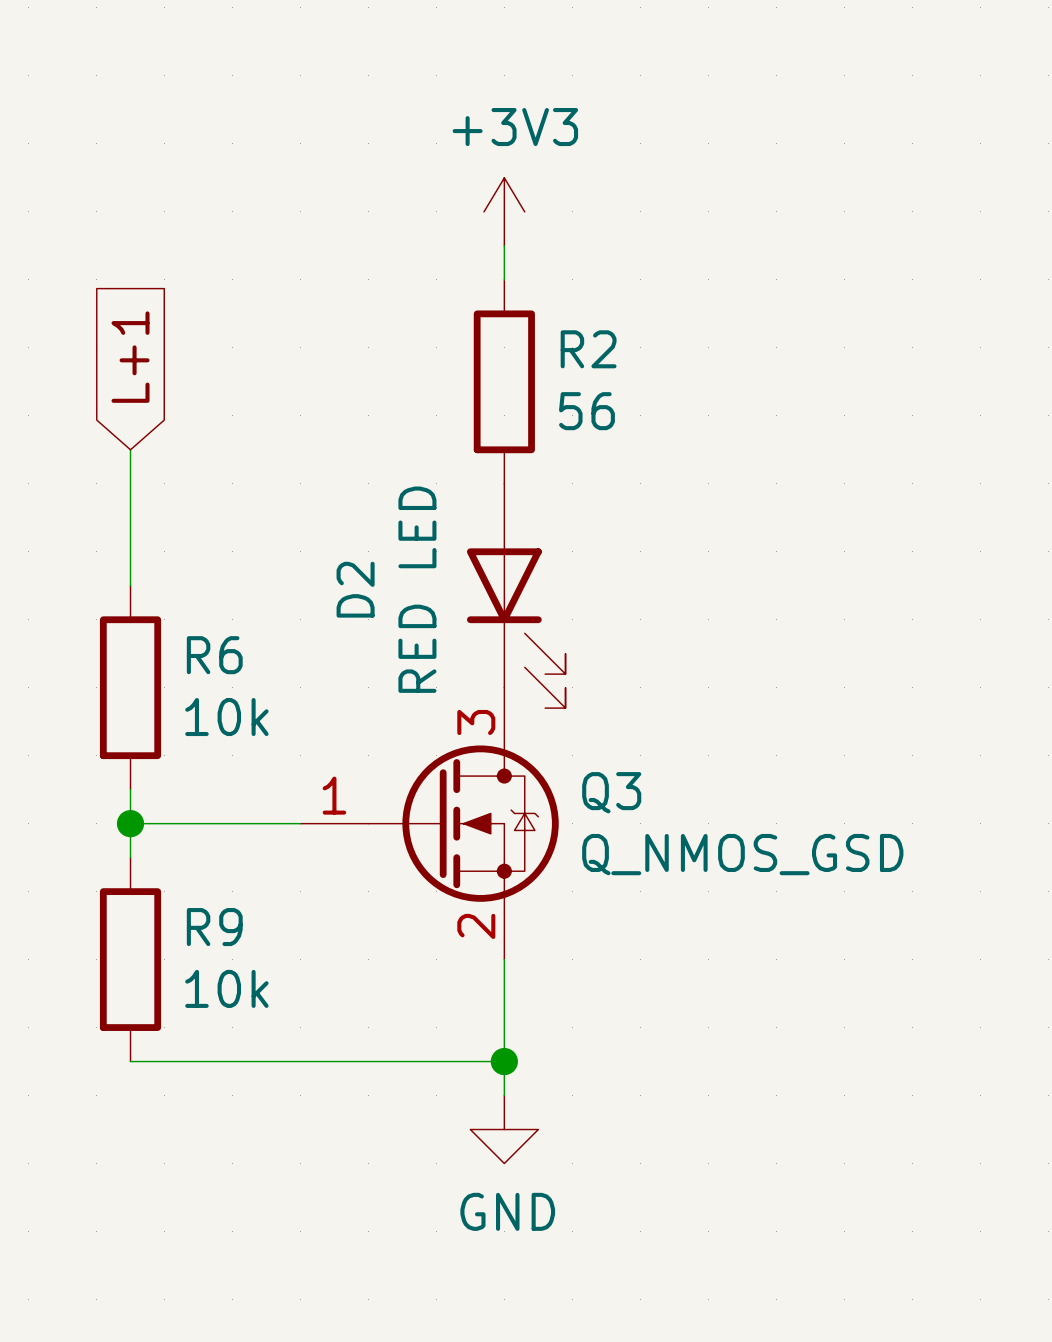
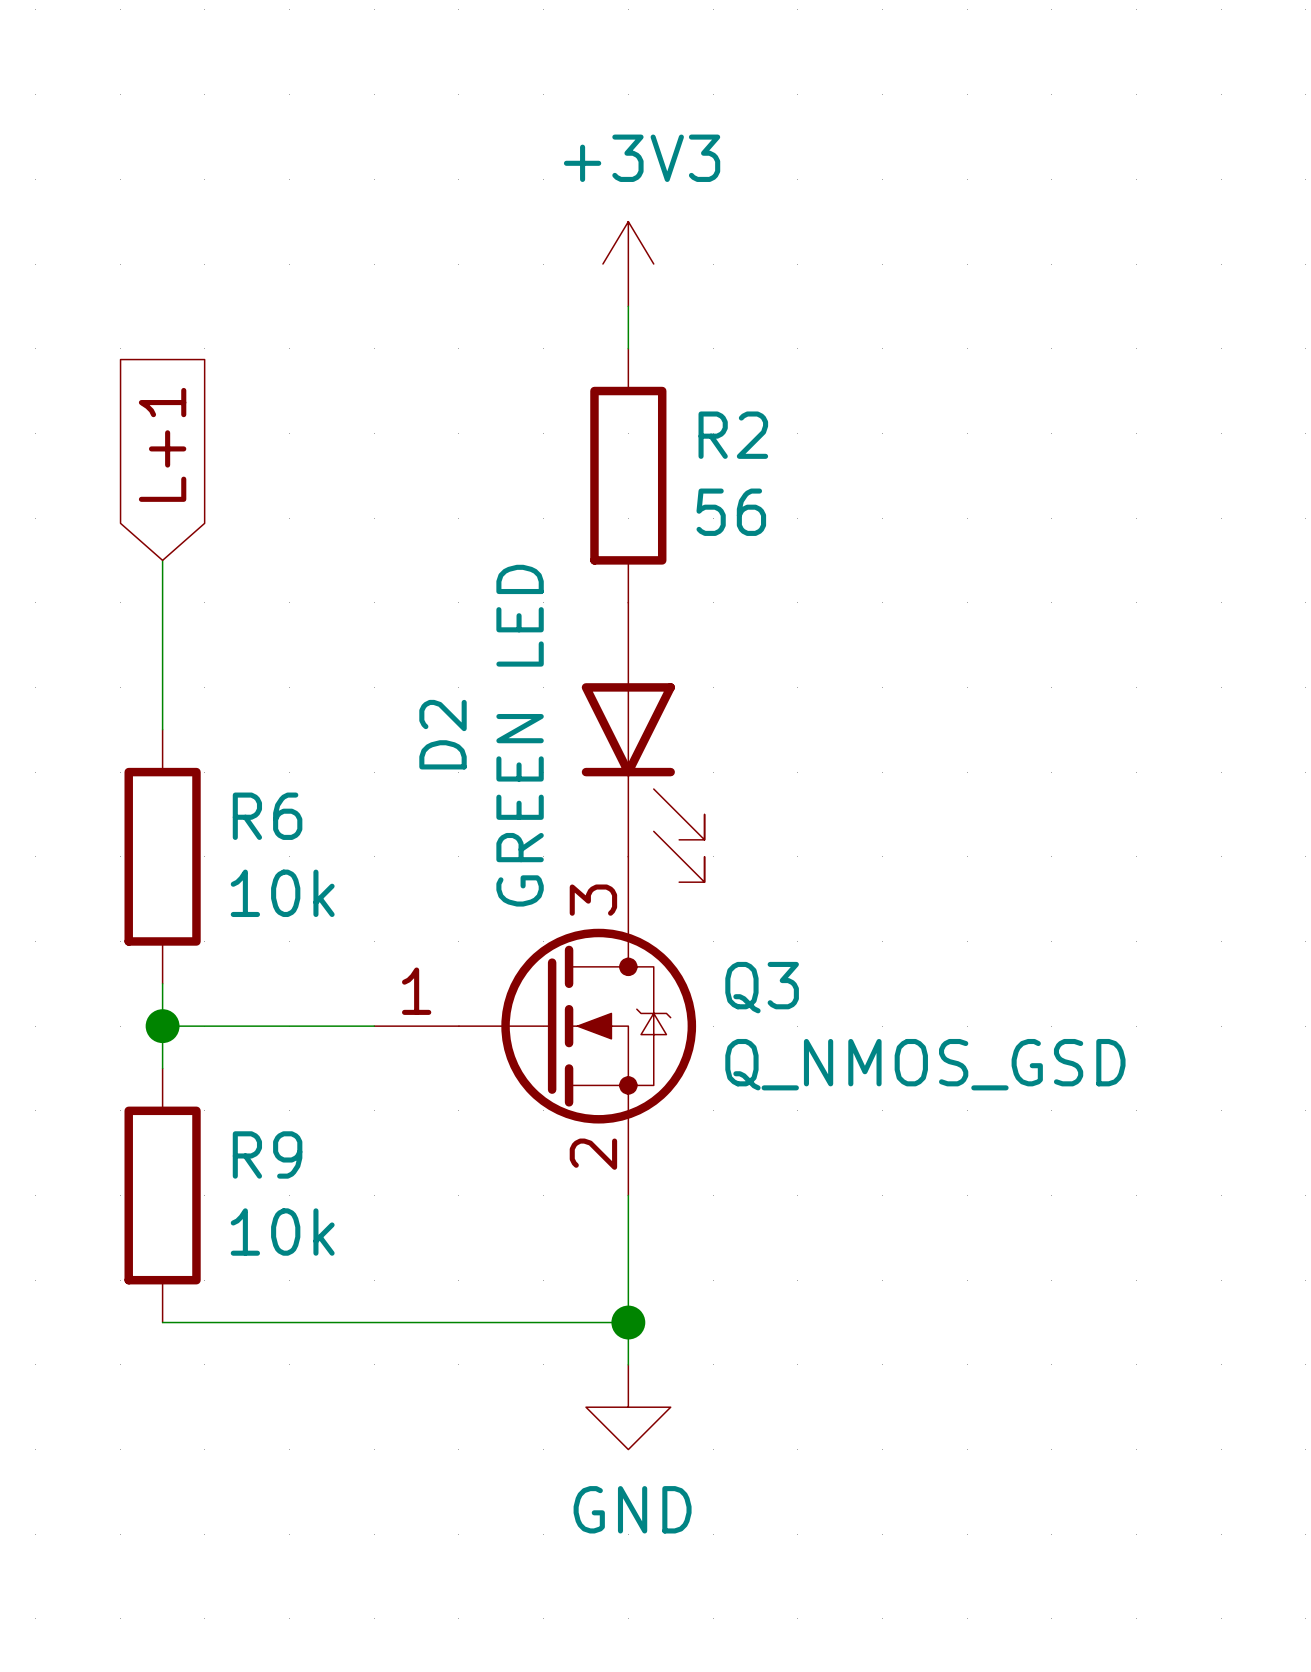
D2 value: RED LED (417, 589) -> GREEN LED (520, 735)

